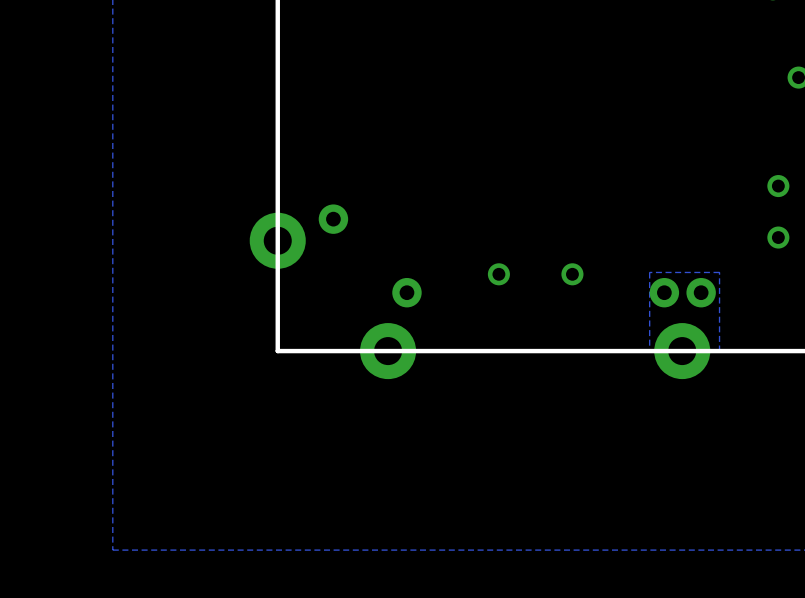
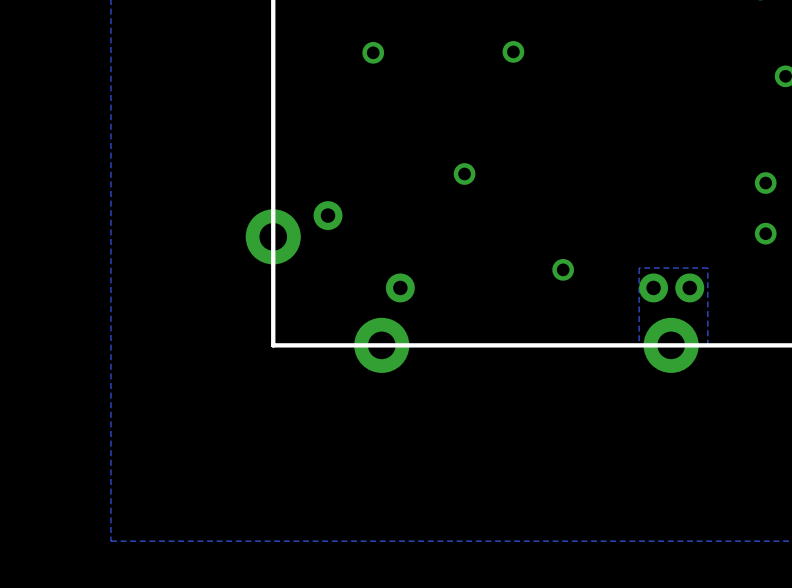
via: none -> (513, 51)
via: none -> (373, 52)
via: none -> (464, 173)
via: (498, 274) -> none

